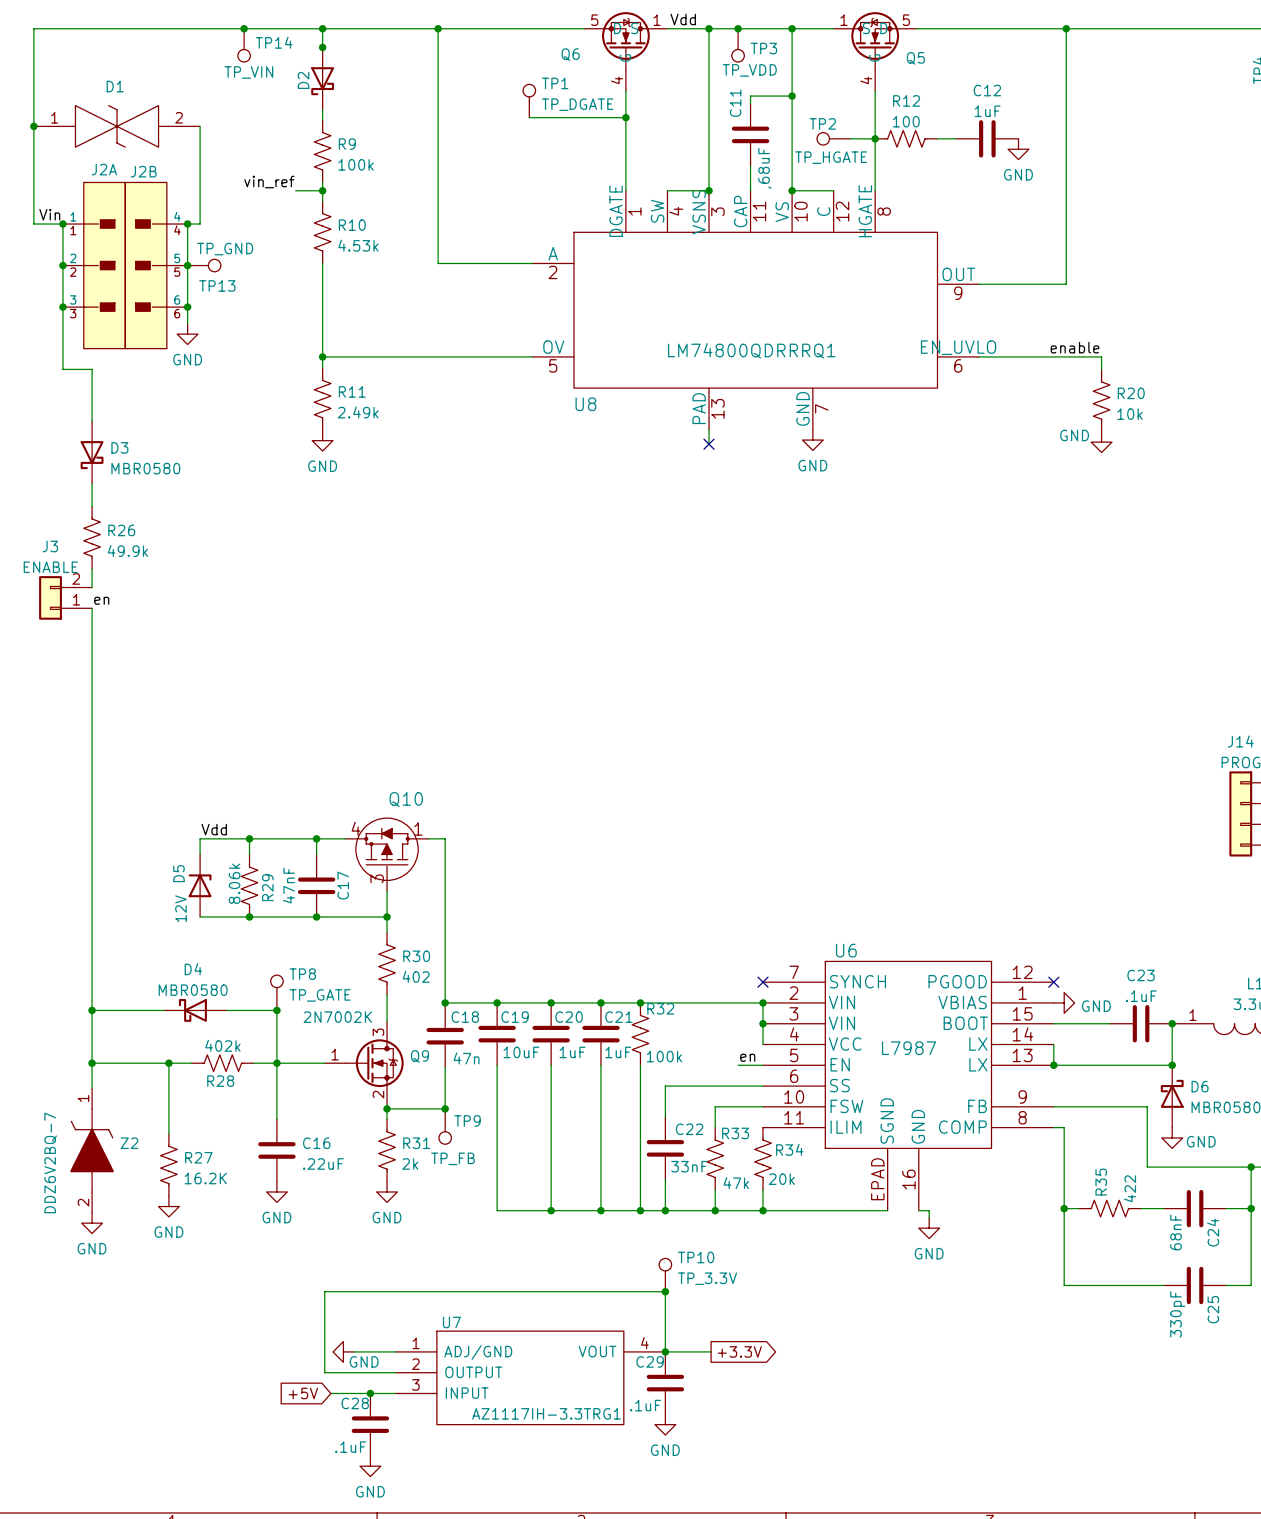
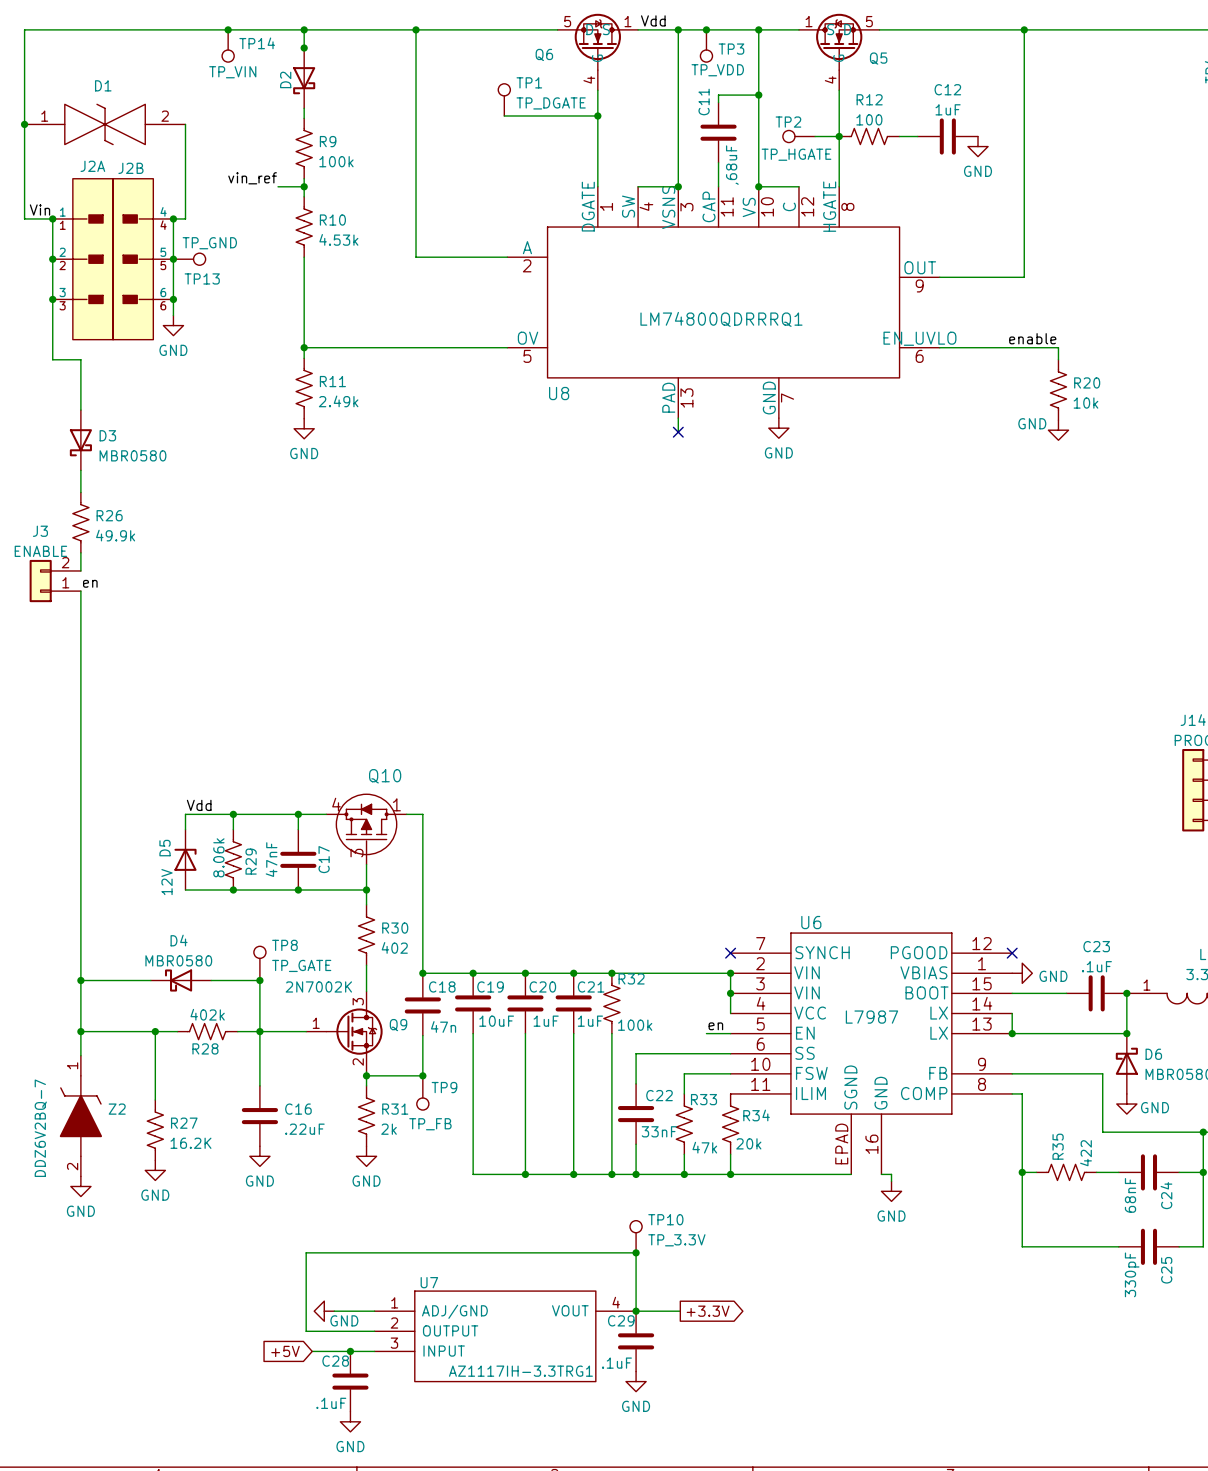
U8 value position: LM74800QDRRRQ1 (751, 350) -> LM74800QDRRRQ1 (721, 319)

